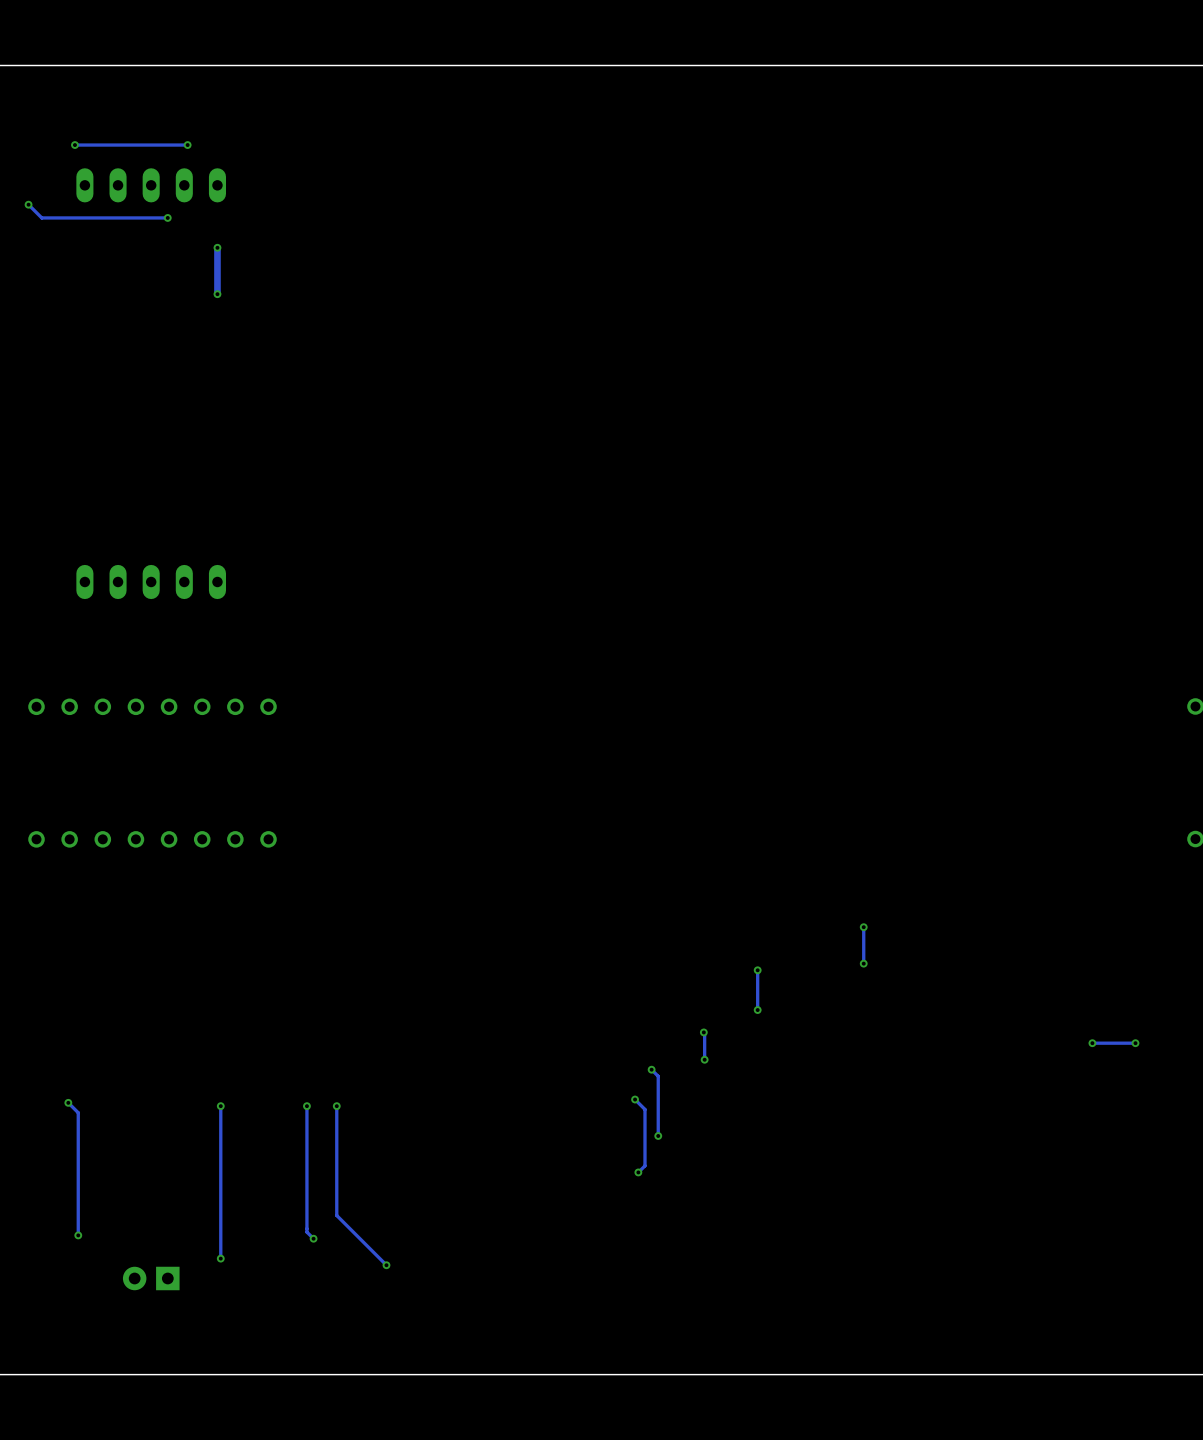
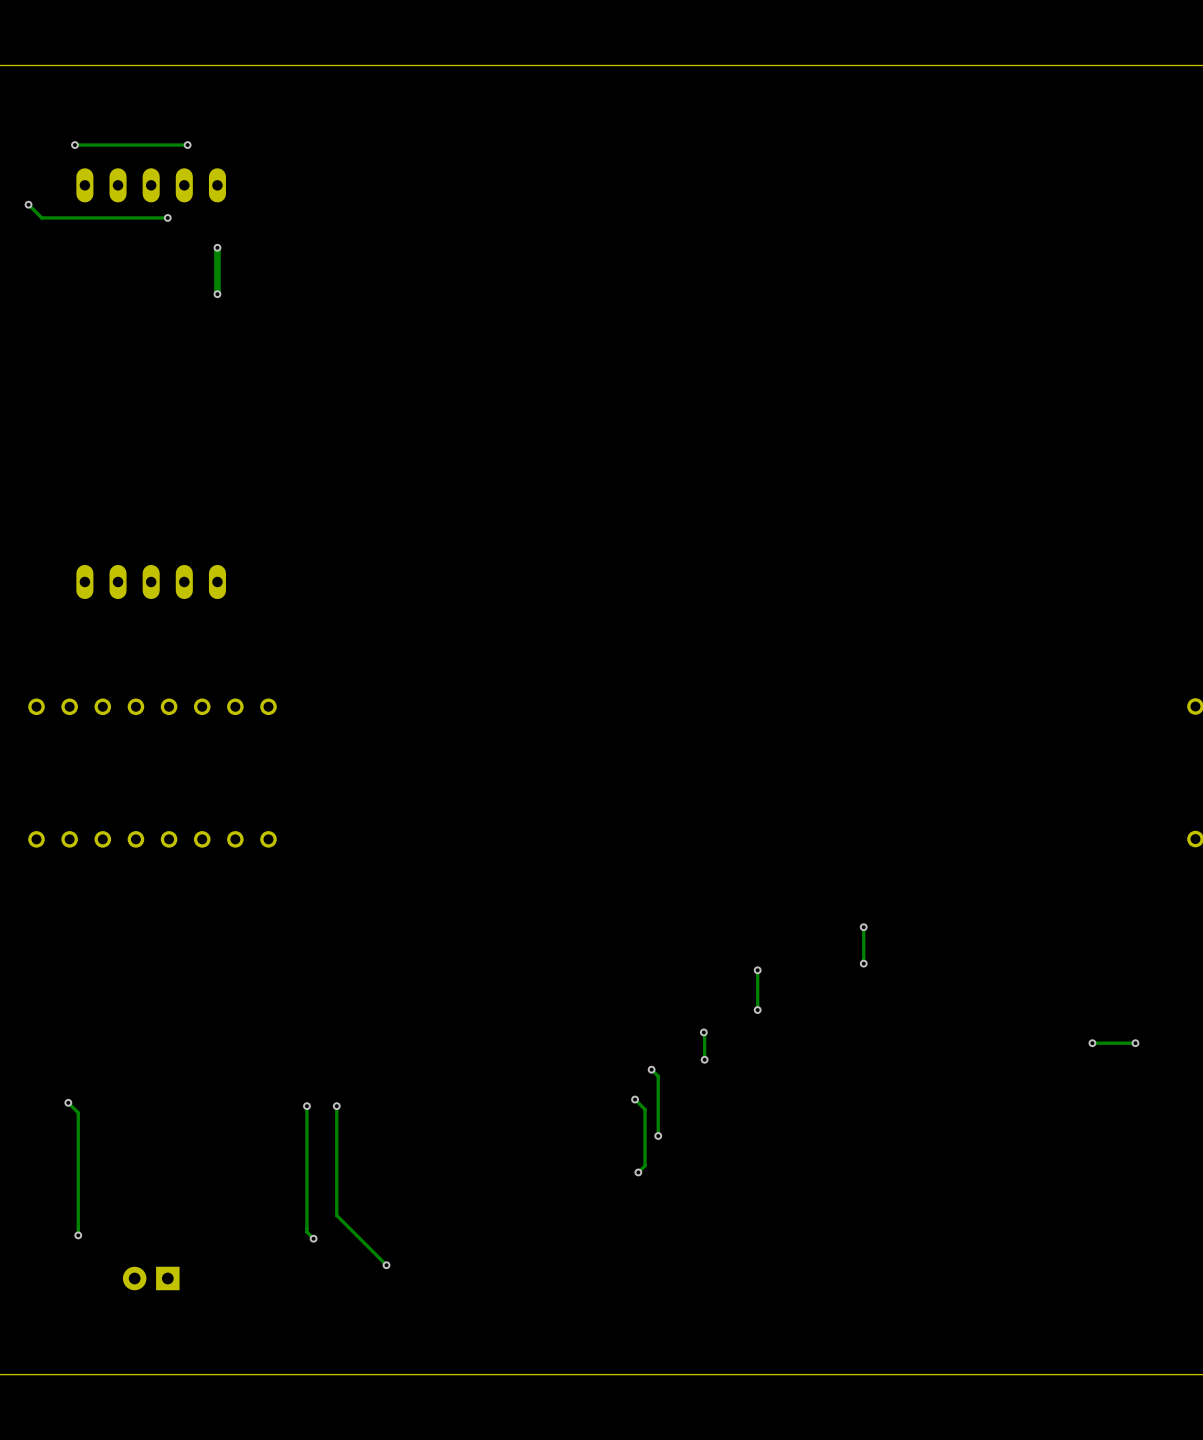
track: (220, 1106) (220, 1258) -> none
via: (220, 1106) -> none
via: (220, 1258) -> none

